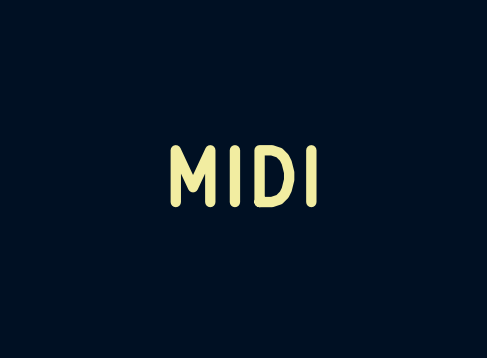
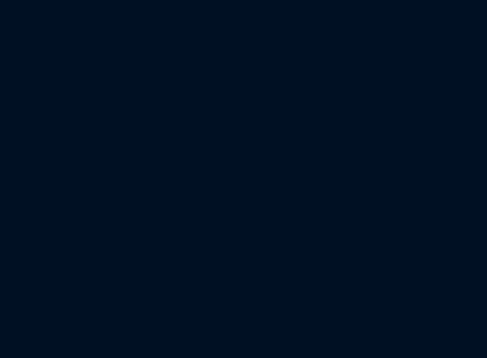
text: MIDI (243, 176) -> none

